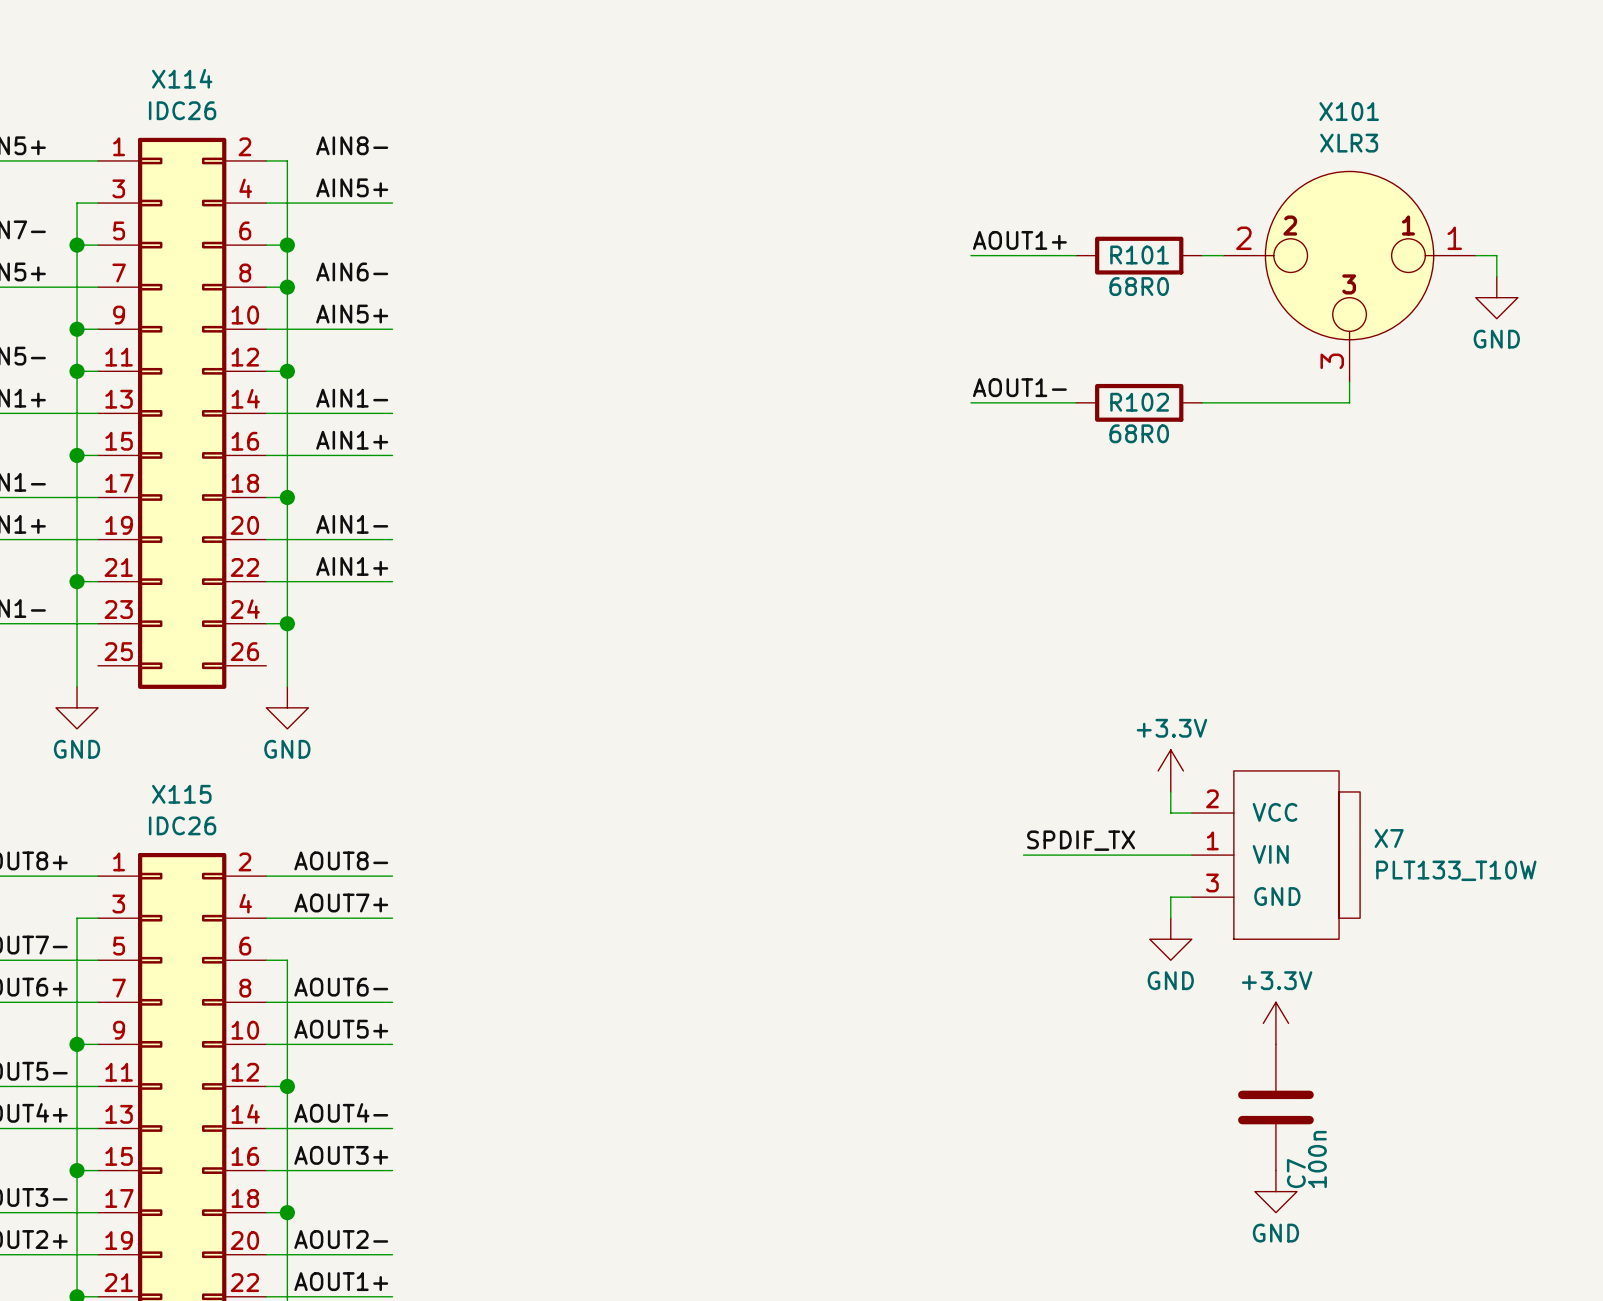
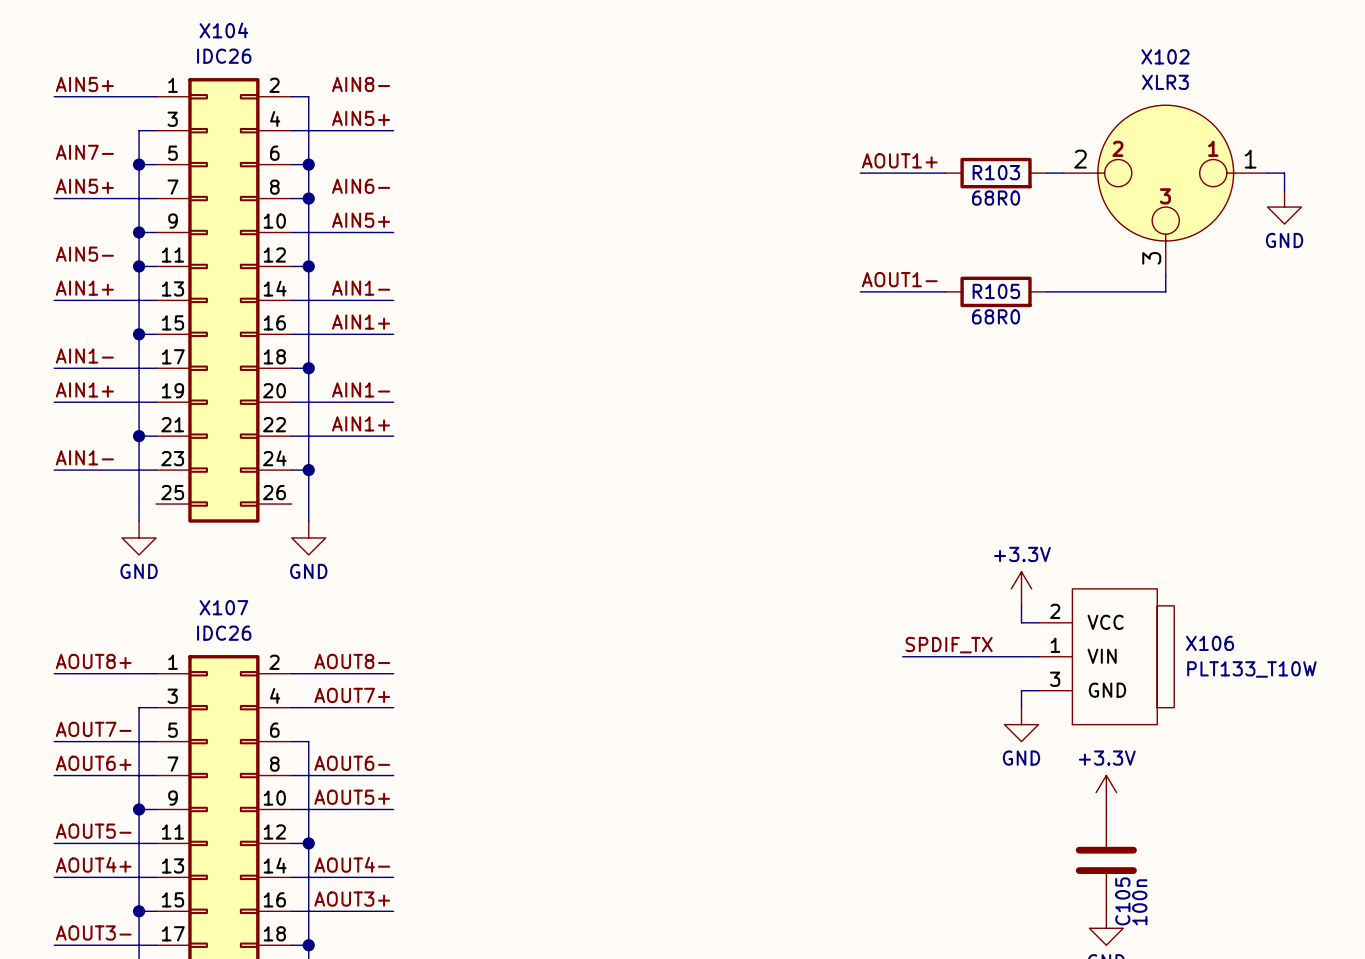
X114 name: X114 (182, 78) -> X104 (223, 30)
X101 name: X101 (1349, 111) -> X102 (1165, 56)
R101 name: R101 (1139, 255) -> R103 (996, 172)
R102 name: R102 (1139, 402) -> R105 (996, 291)
X115 name: X115 (181, 794) -> X107 (223, 607)
X7 name: X7 (1389, 838) -> X106 (1209, 643)
C7 name: C7 (1296, 1173) -> C105 (1122, 901)

